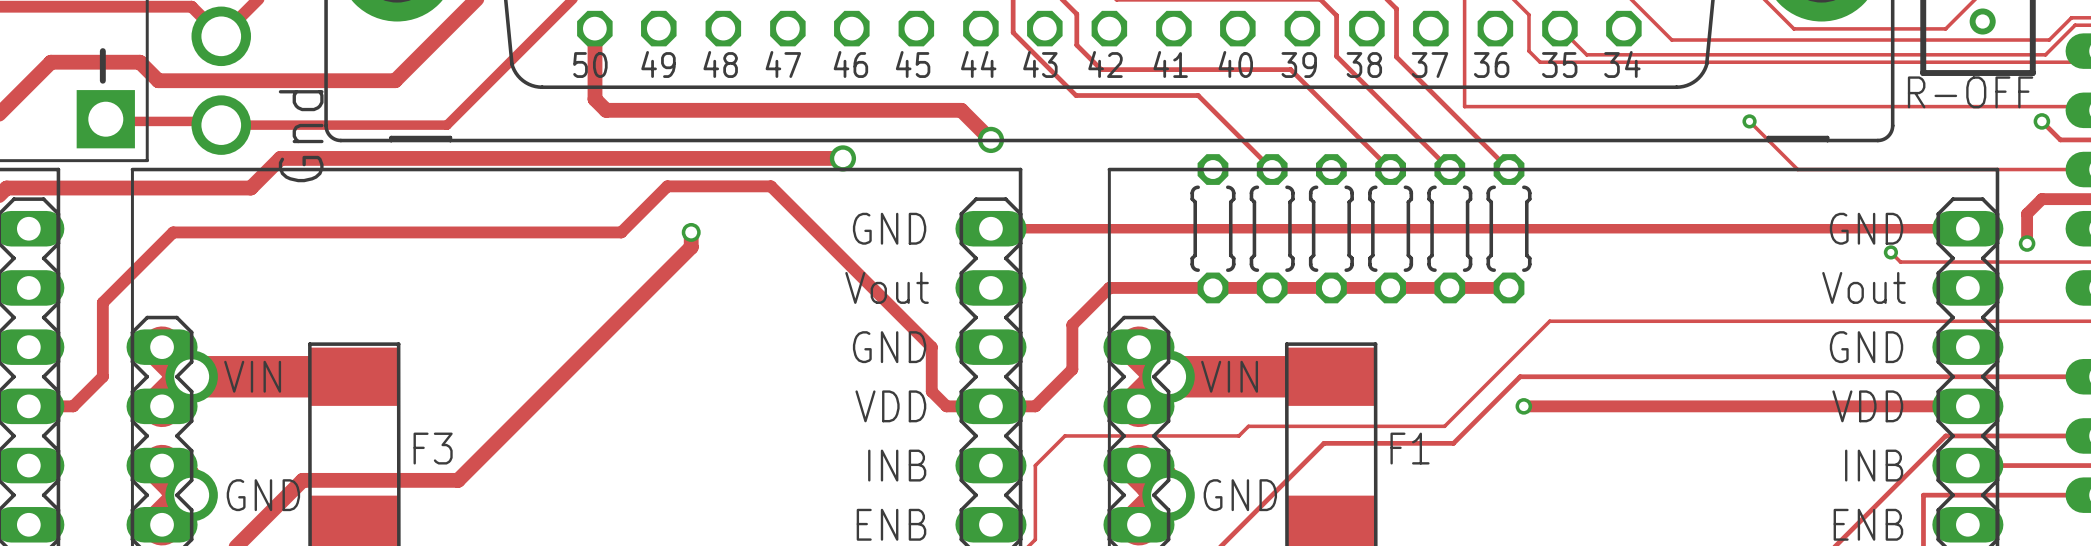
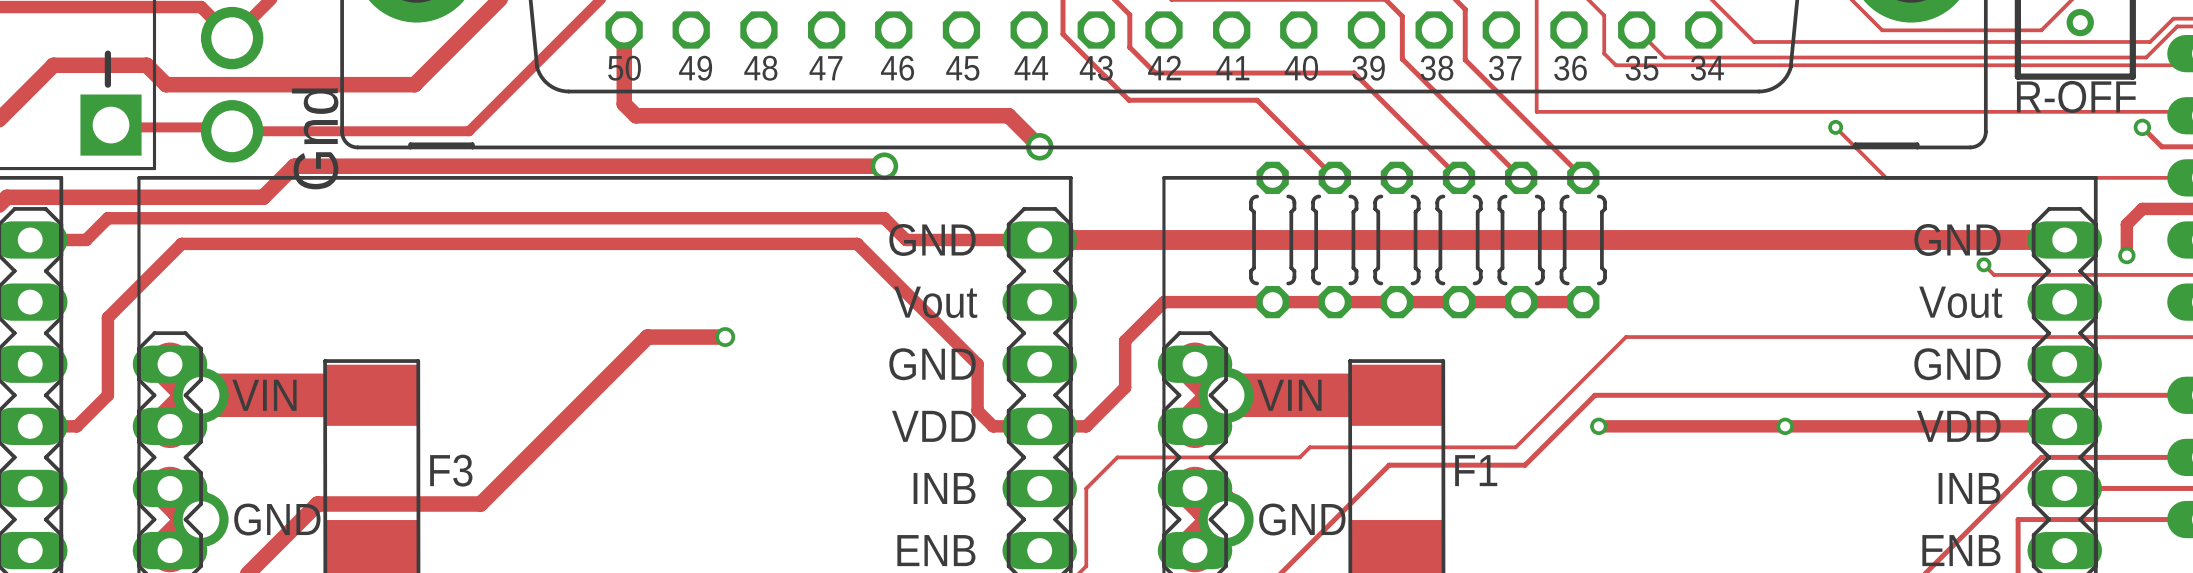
track: none -> (30, 239) (86, 239) (107, 218) (884, 218) (906, 239) (1039, 239)
track width: thin (990, 228) (1967, 228) -> thick (1039, 239) (2064, 239)
track: (621, 232) (667, 186) (770, 186) (817, 232) -> (651, 243) (857, 243)
track: (691, 232) (691, 247) (617, 321) -> (725, 337) (647, 337)
via position: (691, 232) -> (725, 337)
via: none -> (1785, 426)

